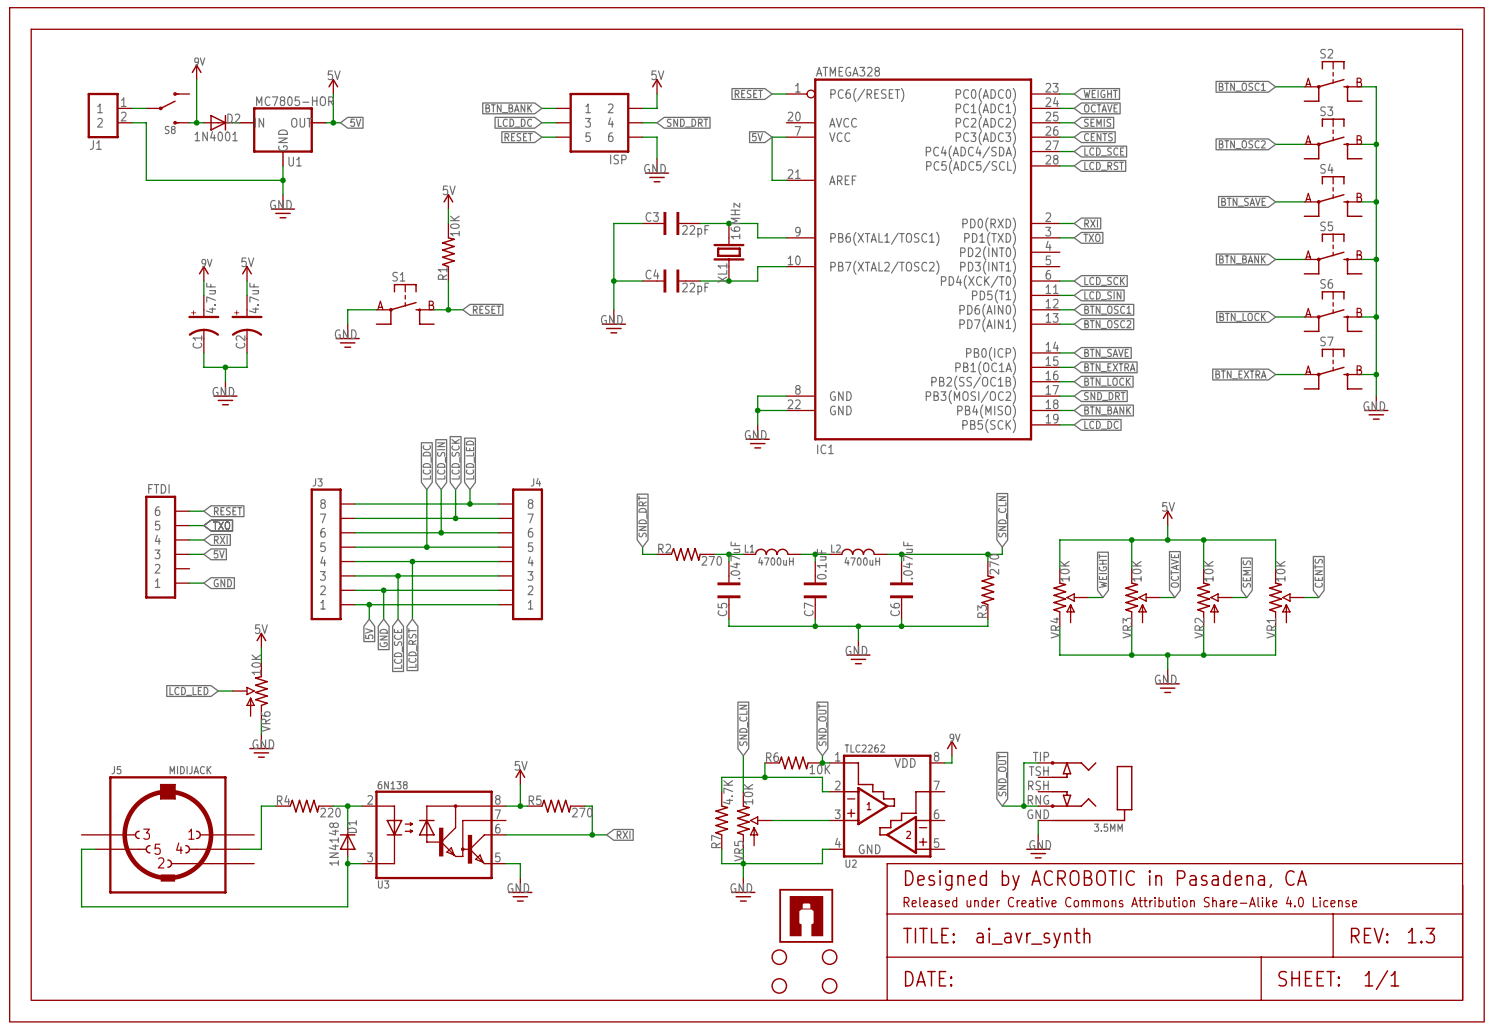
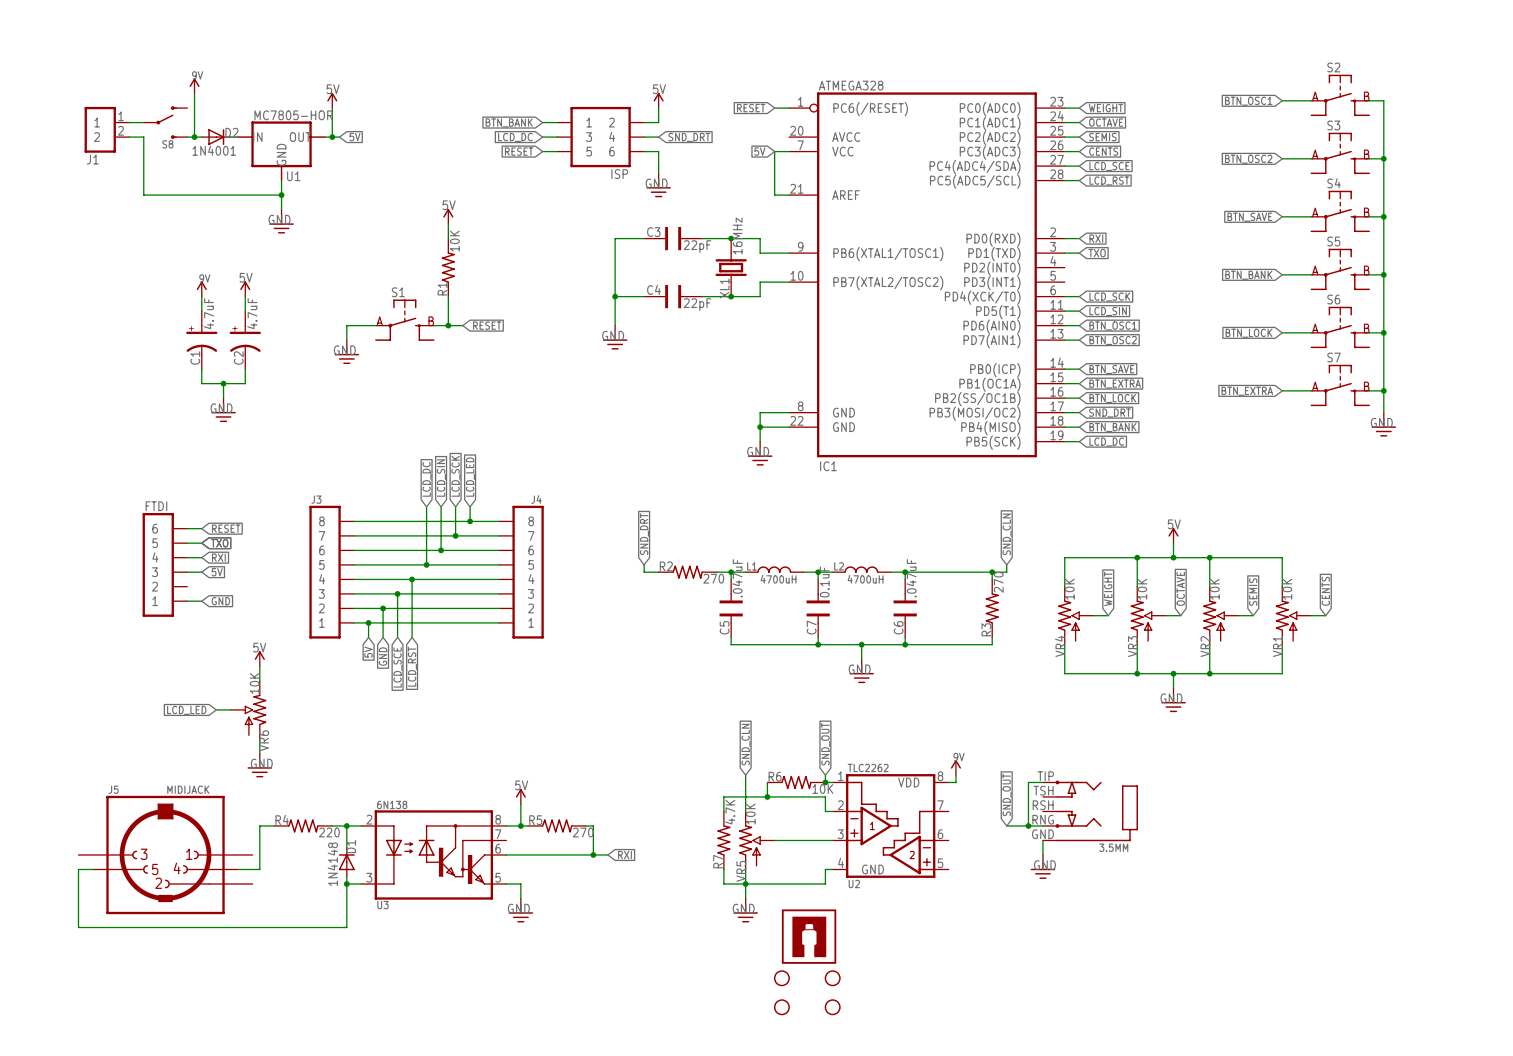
part: (746, 514) -> none
part: (1174, 931) -> none

